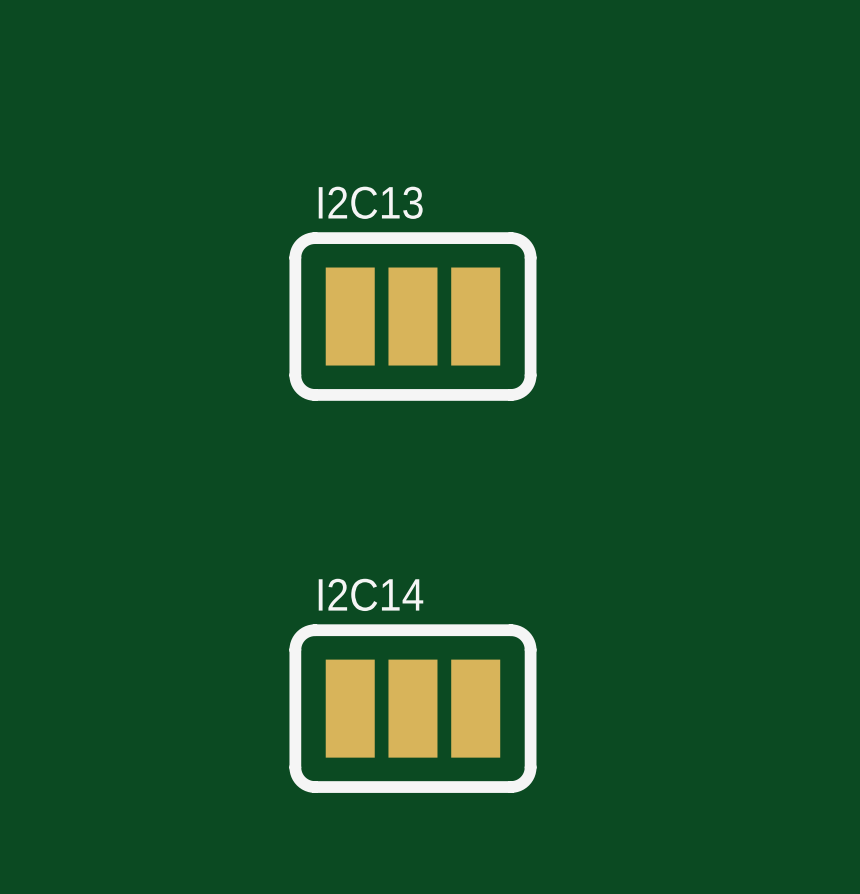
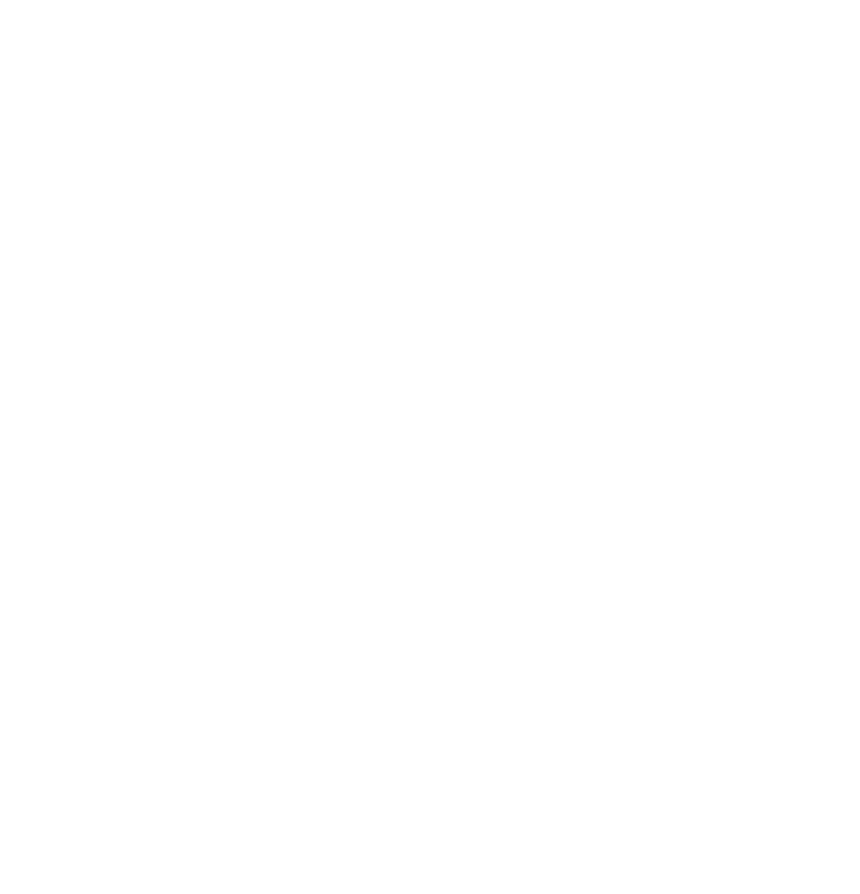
I2C13: (412, 316) -> none
I2C14: (412, 708) -> none

